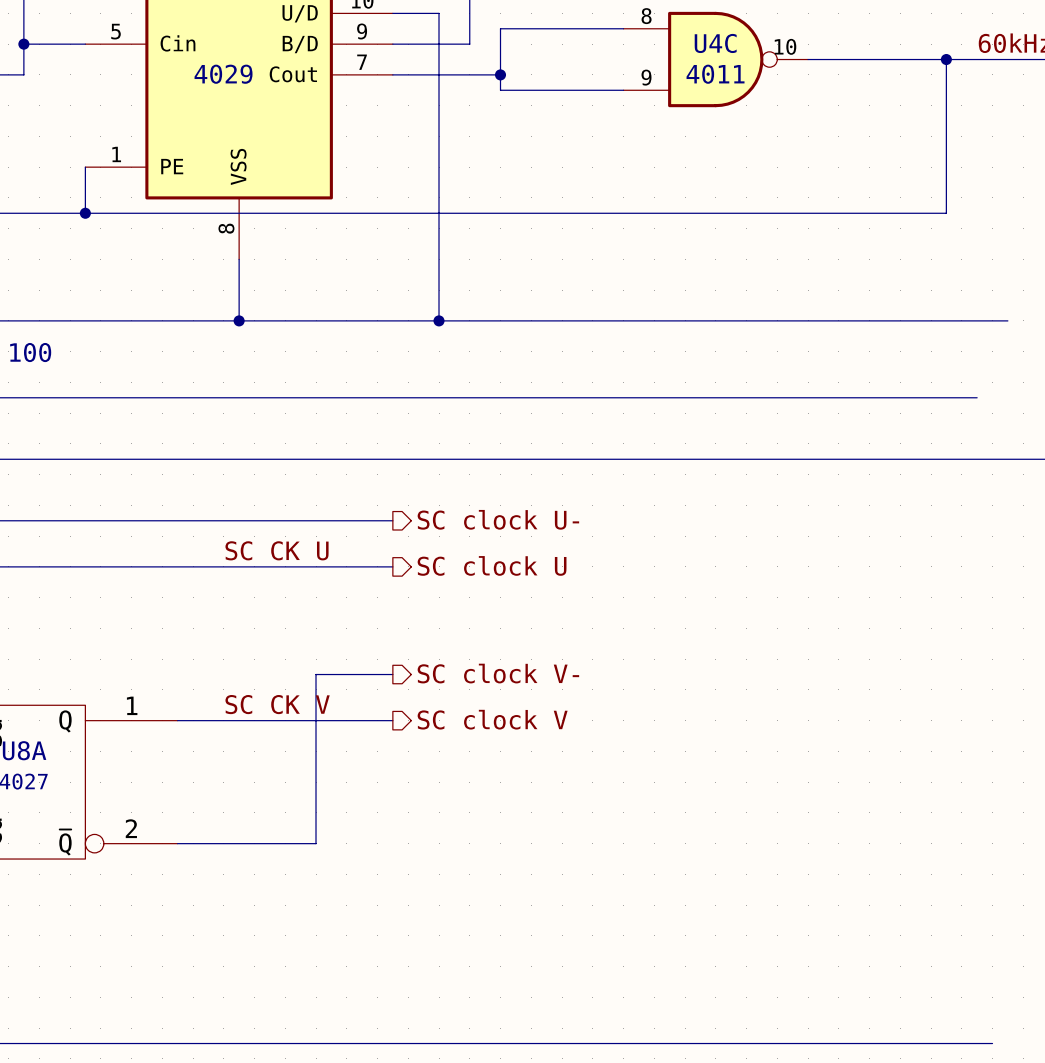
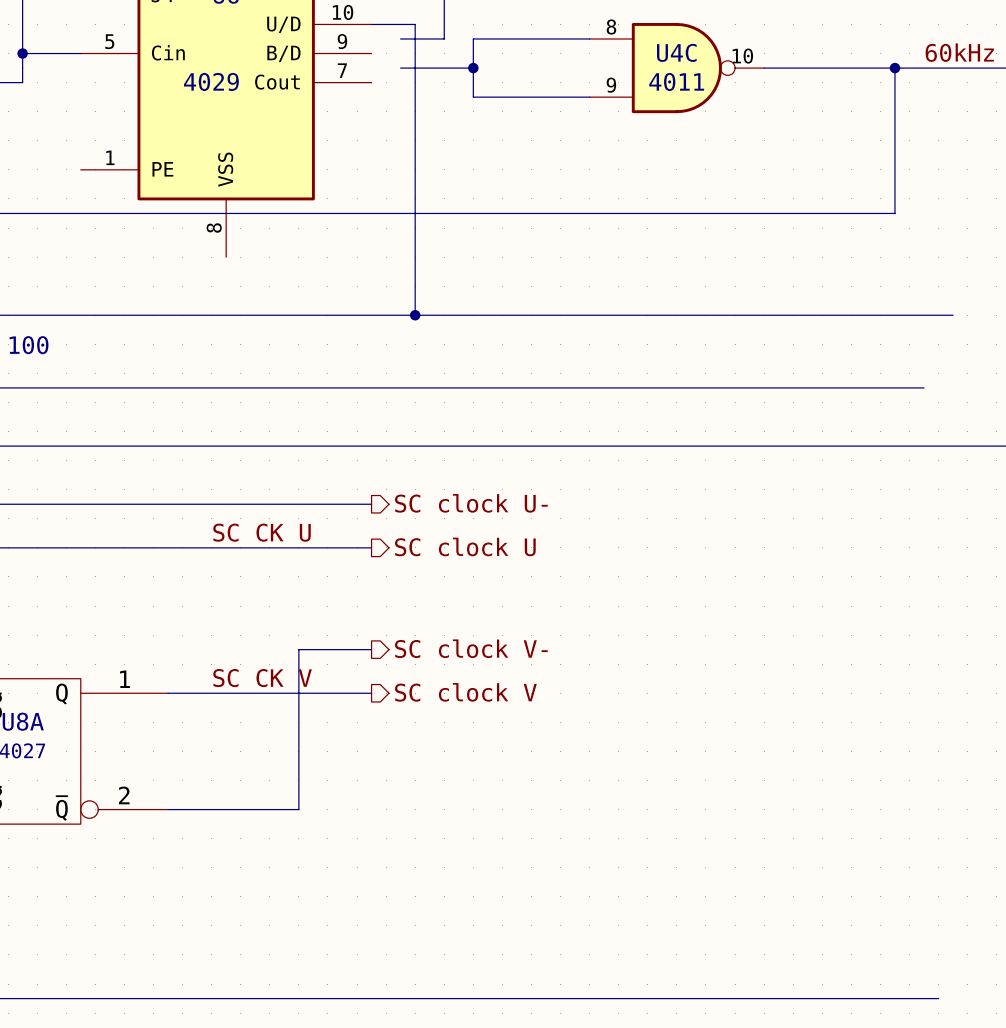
wire: (469, 28) (469, 44) (392, 44) -> (444, 38) (400, 38)
wire: none -> (400, 68) (473, 68)
wire: (392, 74) (500, 74) -> none
junction position: (500, 74) -> (473, 68)
wire: (85, 167) (85, 213) -> none
junction: (85, 213) -> none
wire: (239, 259) (239, 320) -> none
junction: (239, 320) -> none

